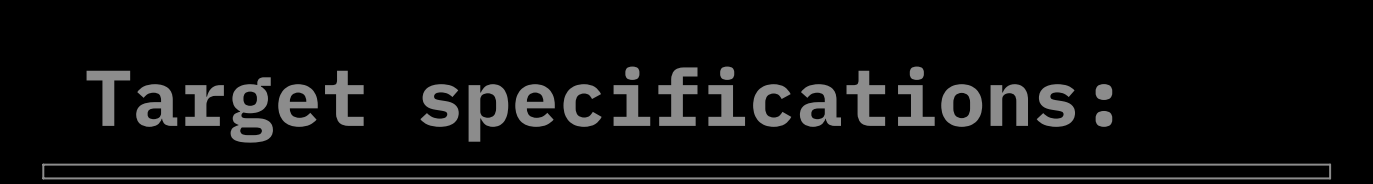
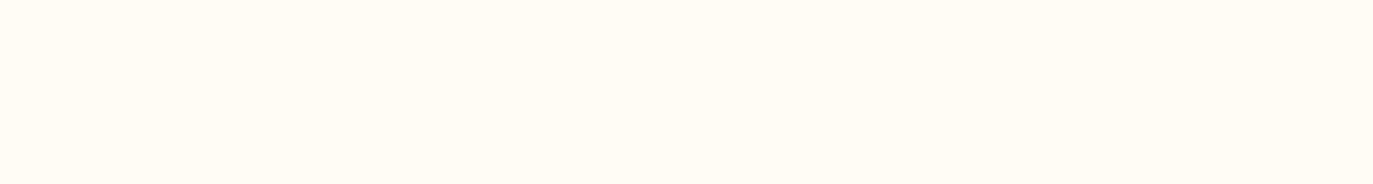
text: Target specifications: (599, 104) -> none
line: (43, 164) (1330, 164) (1330, 178) (43, 178) (43, 164) -> none

